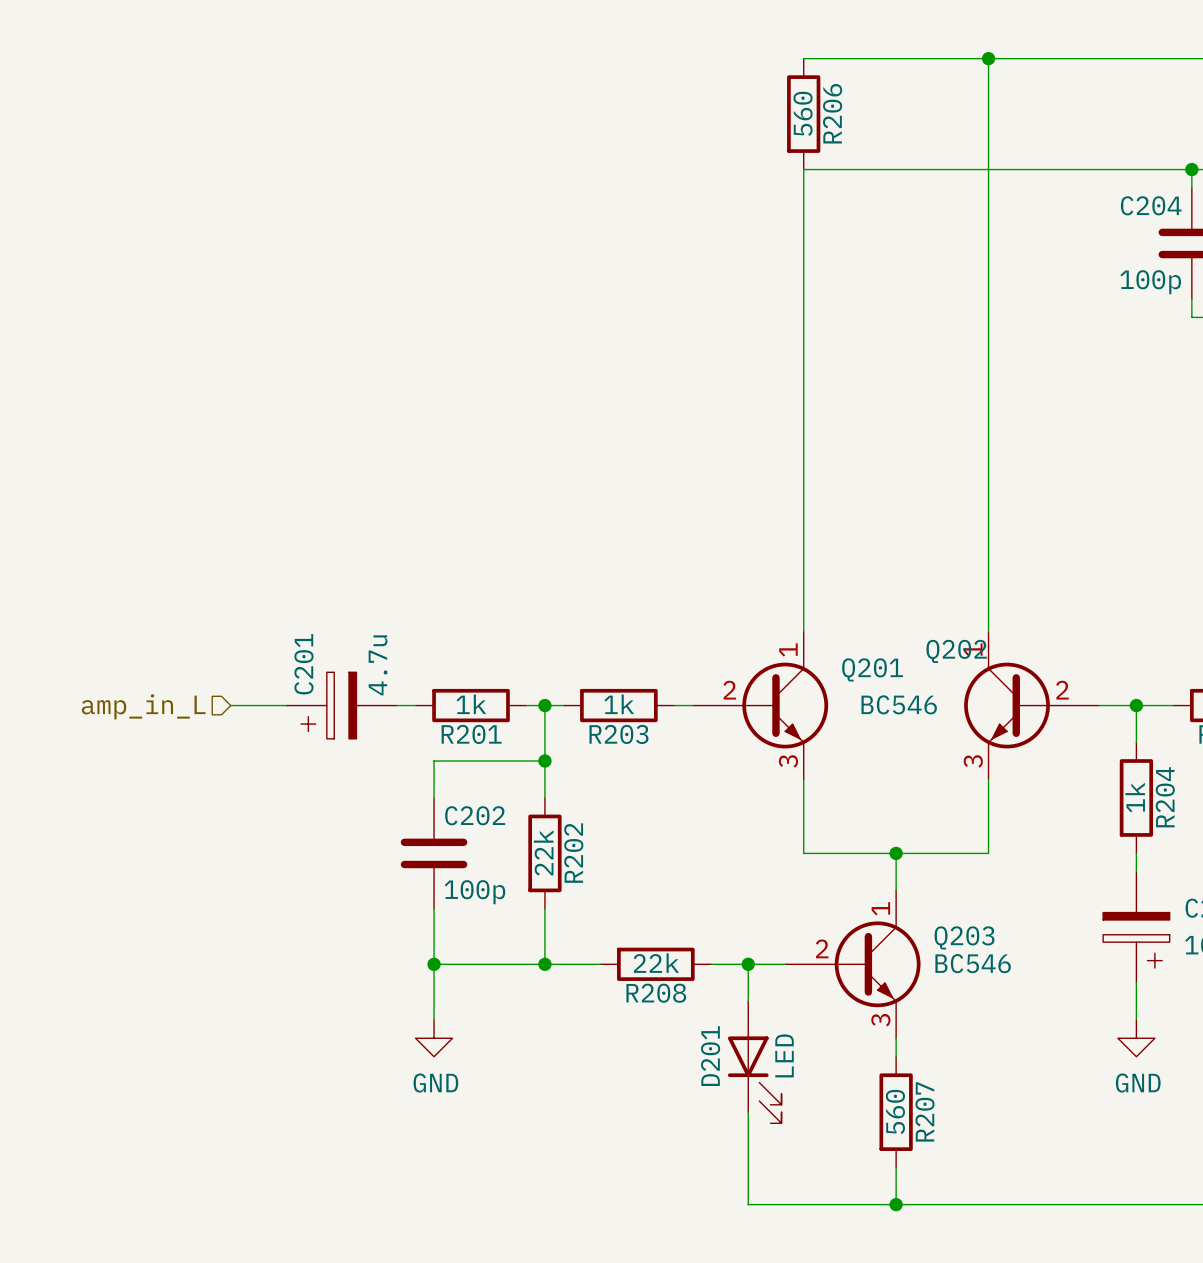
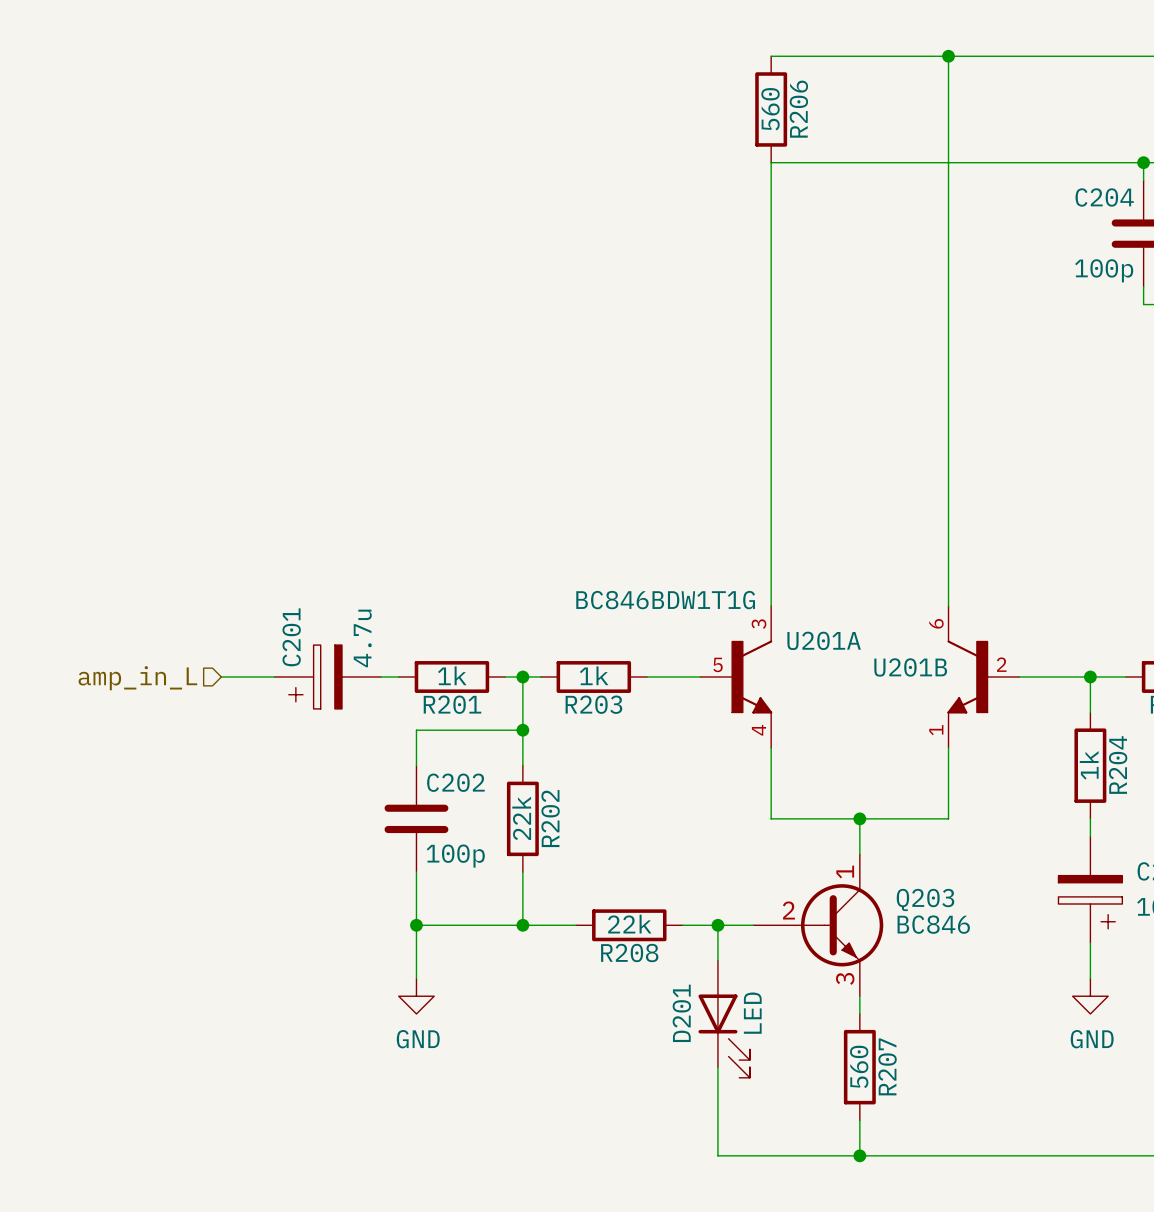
Q201: BC546 (760, 705) -> none
U201A: none -> (736, 677)
U201B: none -> BC846BDW1T1G (983, 677)
Q202: (1031, 705) -> none
Q203 value: BC546 (973, 963) -> BC846 (933, 924)

